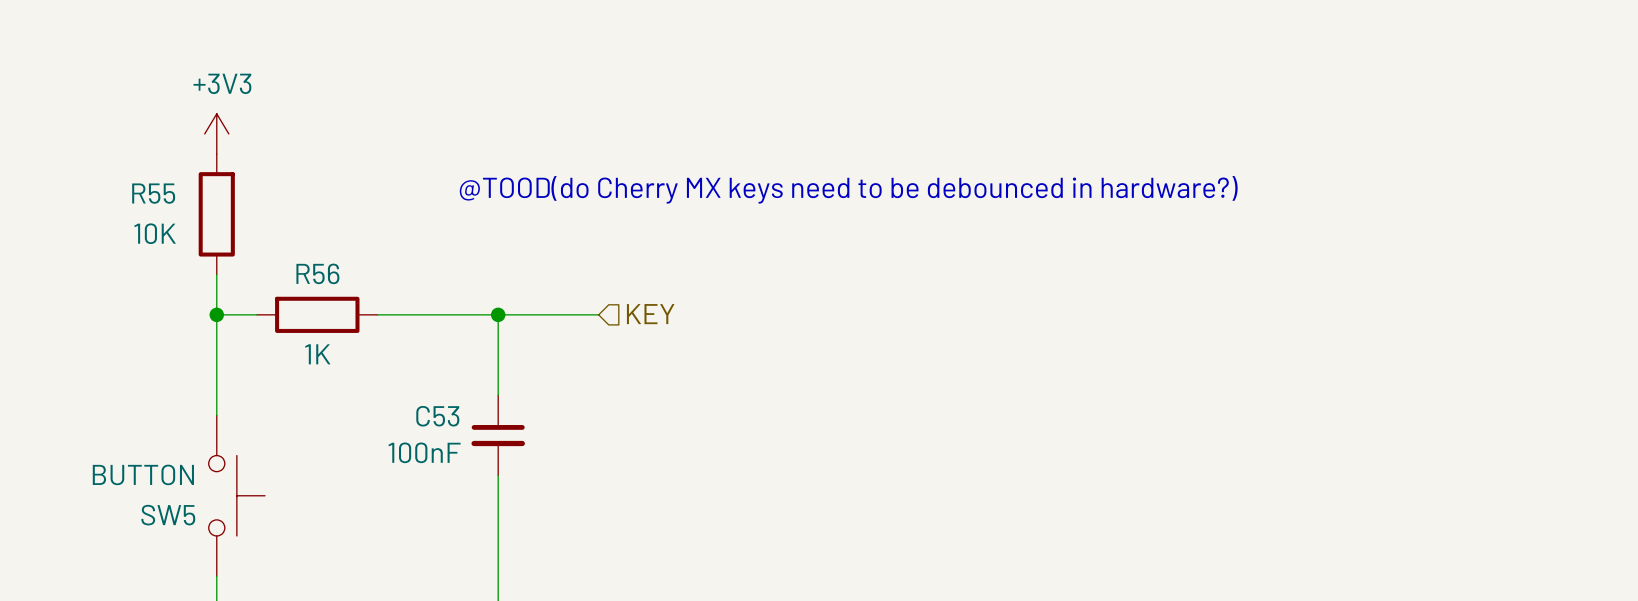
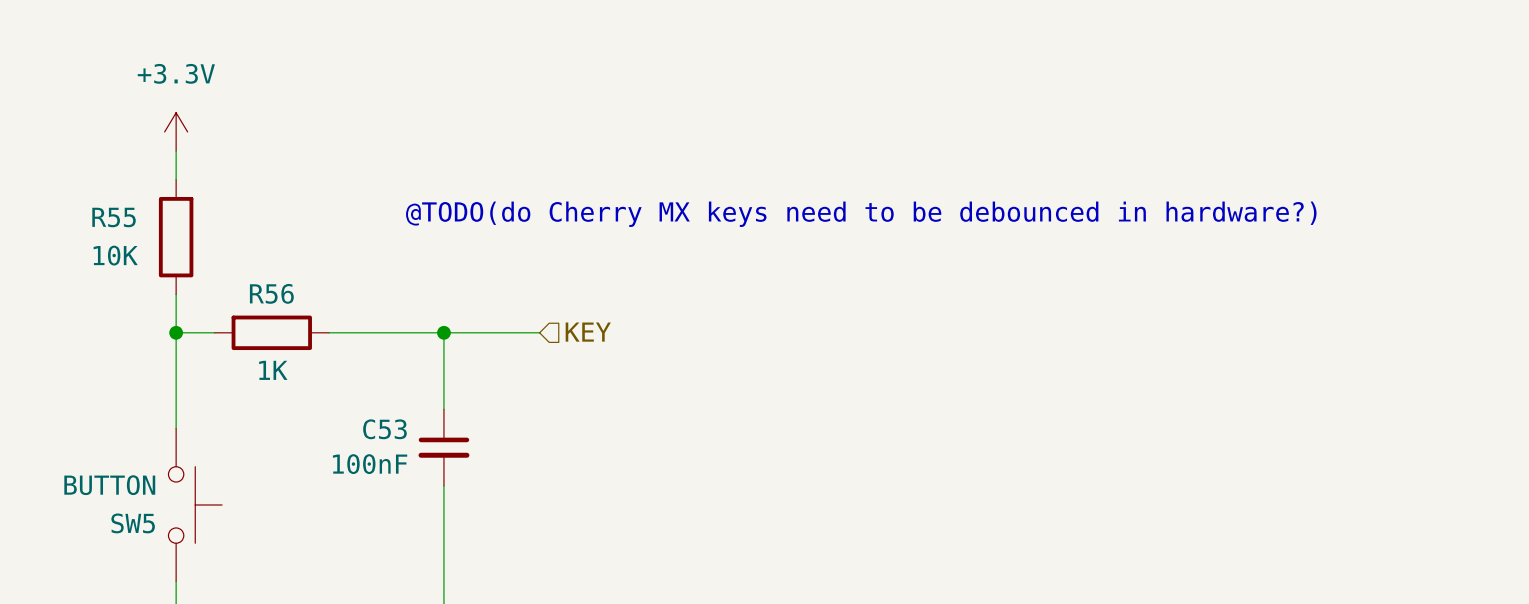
power symbol: none -> +3.3V (176, 131)
power symbol: +3V3 (216, 133) -> none
text: @TOOD(do Cherry MX keys need to be debounced in hardware?) (848, 189) -> @TODO(do Cherry MX keys need to be debounced in hardware?) (861, 214)

